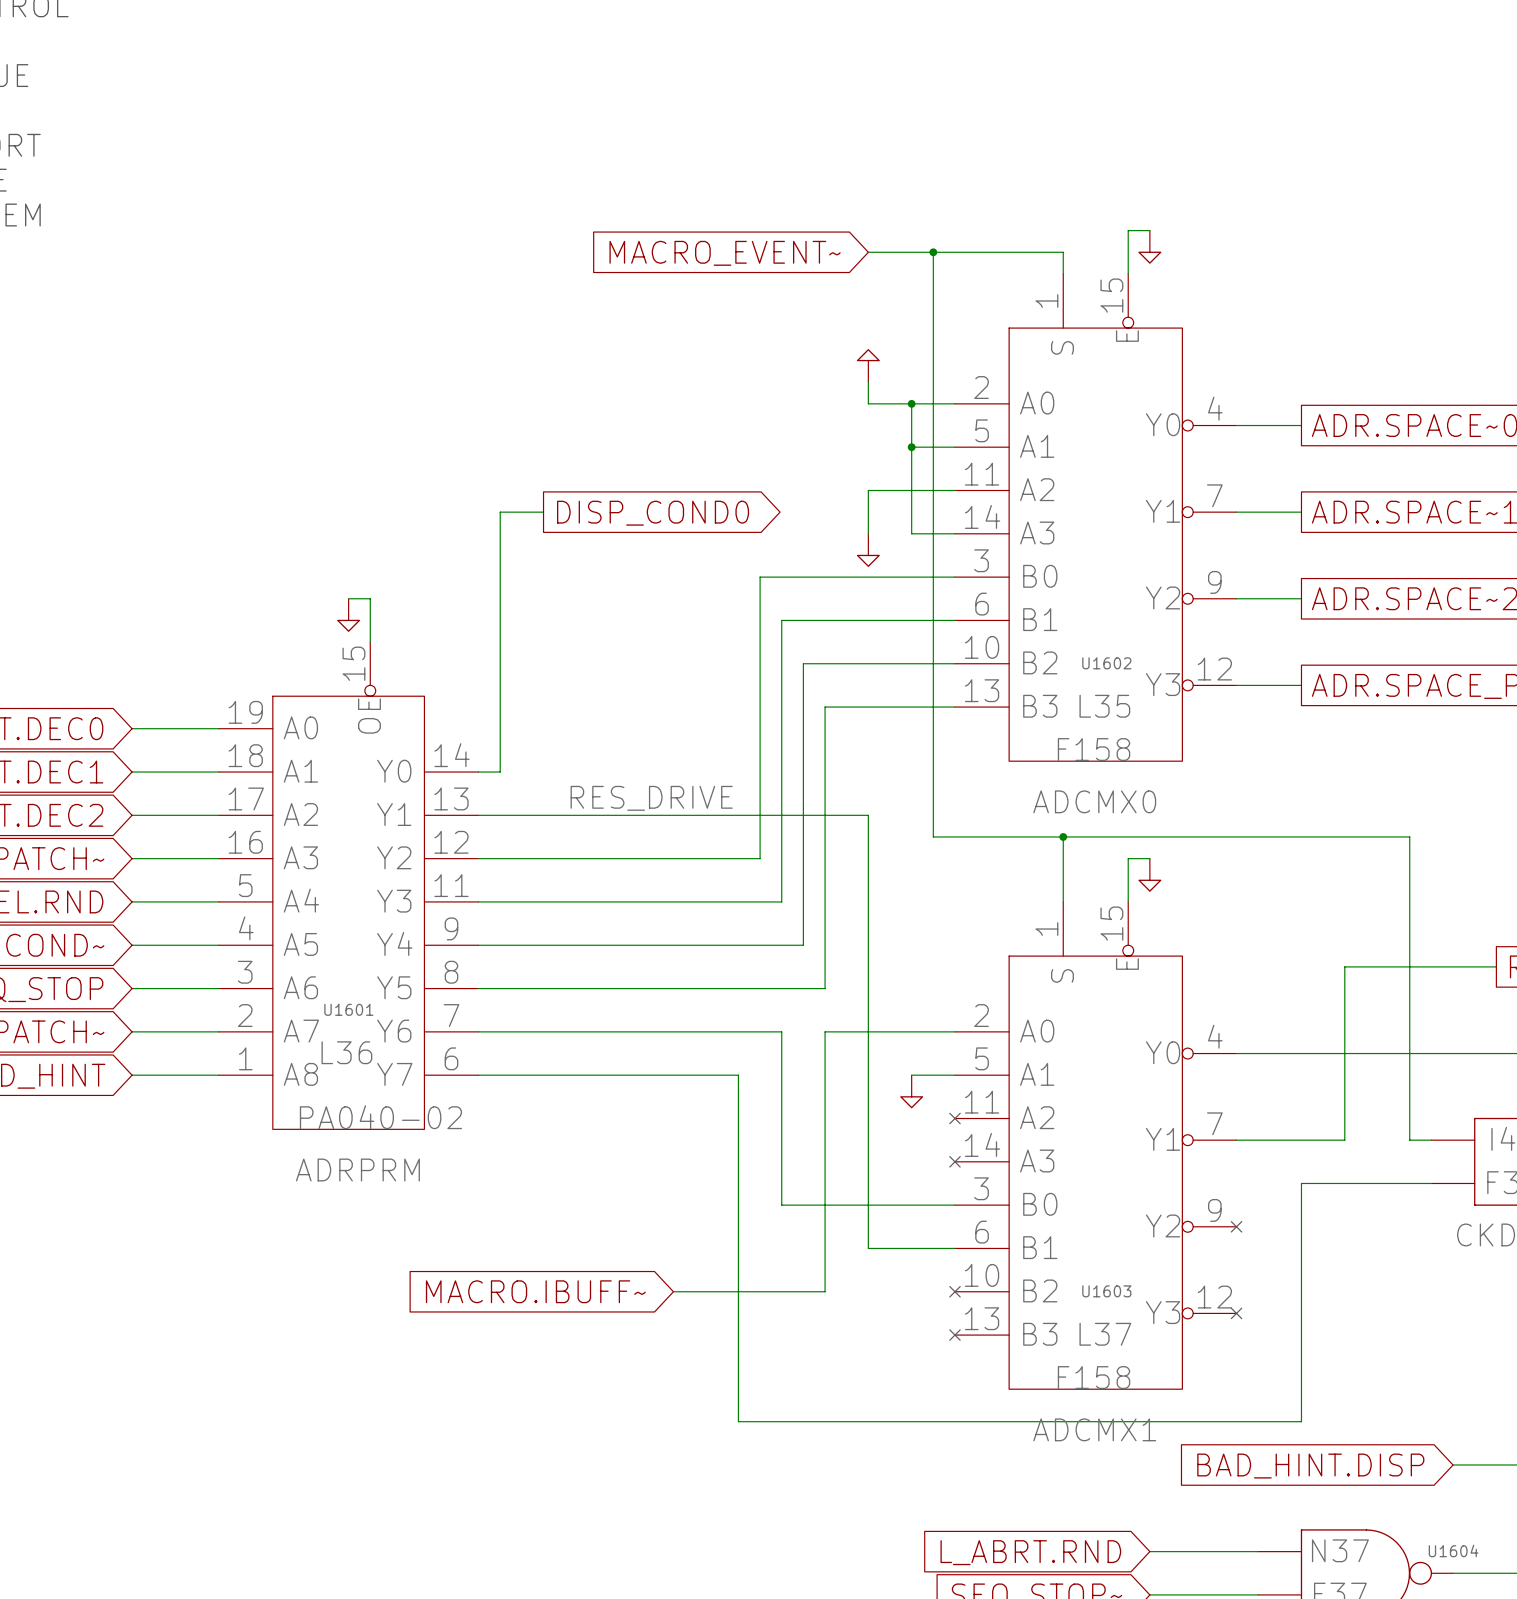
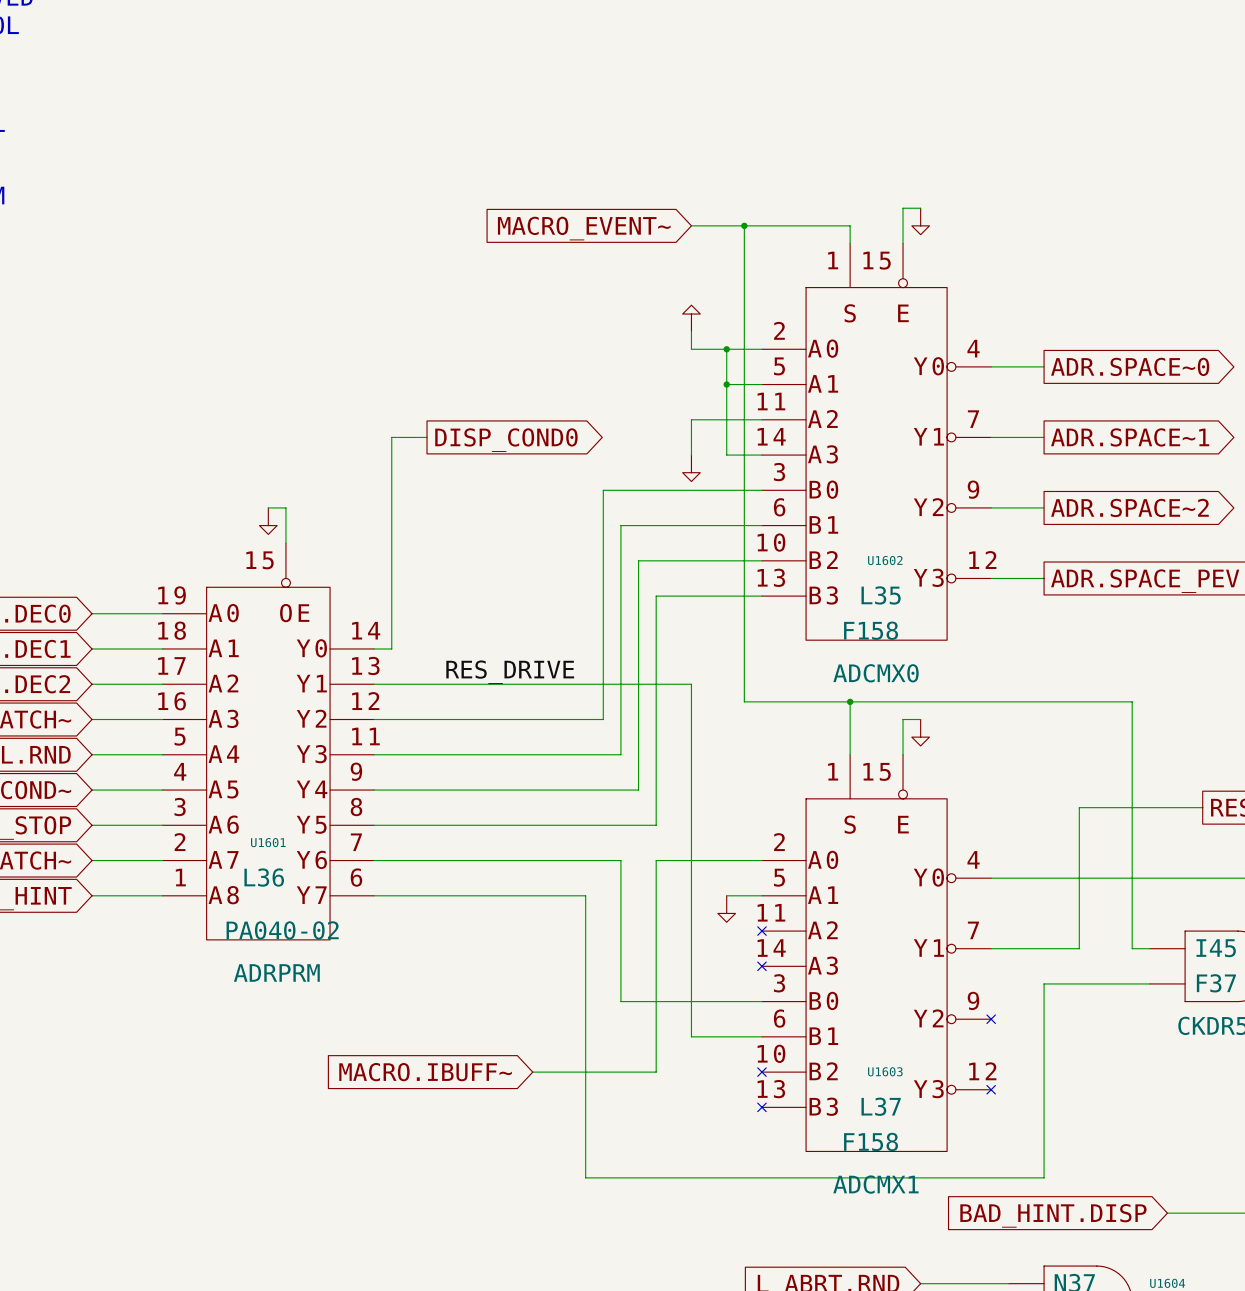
U1602 symbol: [954, 273, 1237, 762] -> [761, 243, 992, 641]
U1601 symbol: [218, 642, 479, 1130] -> [162, 543, 375, 940]
U1603 symbol: [954, 901, 1237, 1390] -> [761, 754, 992, 1152]

